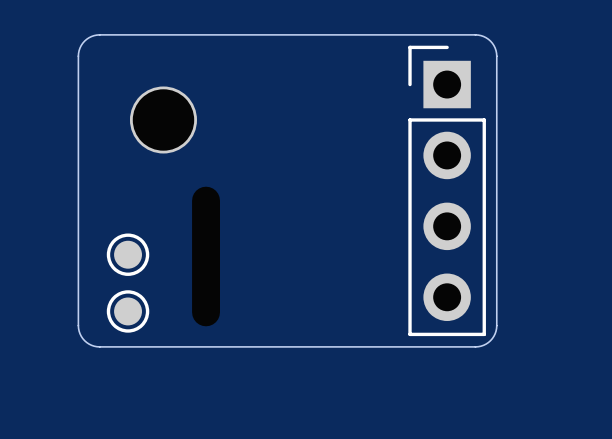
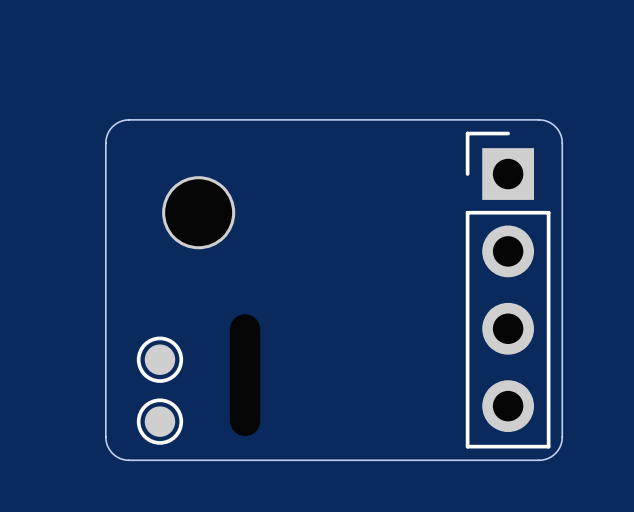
part footprint: [192, 186, 220, 327] -> [229, 314, 261, 437]

